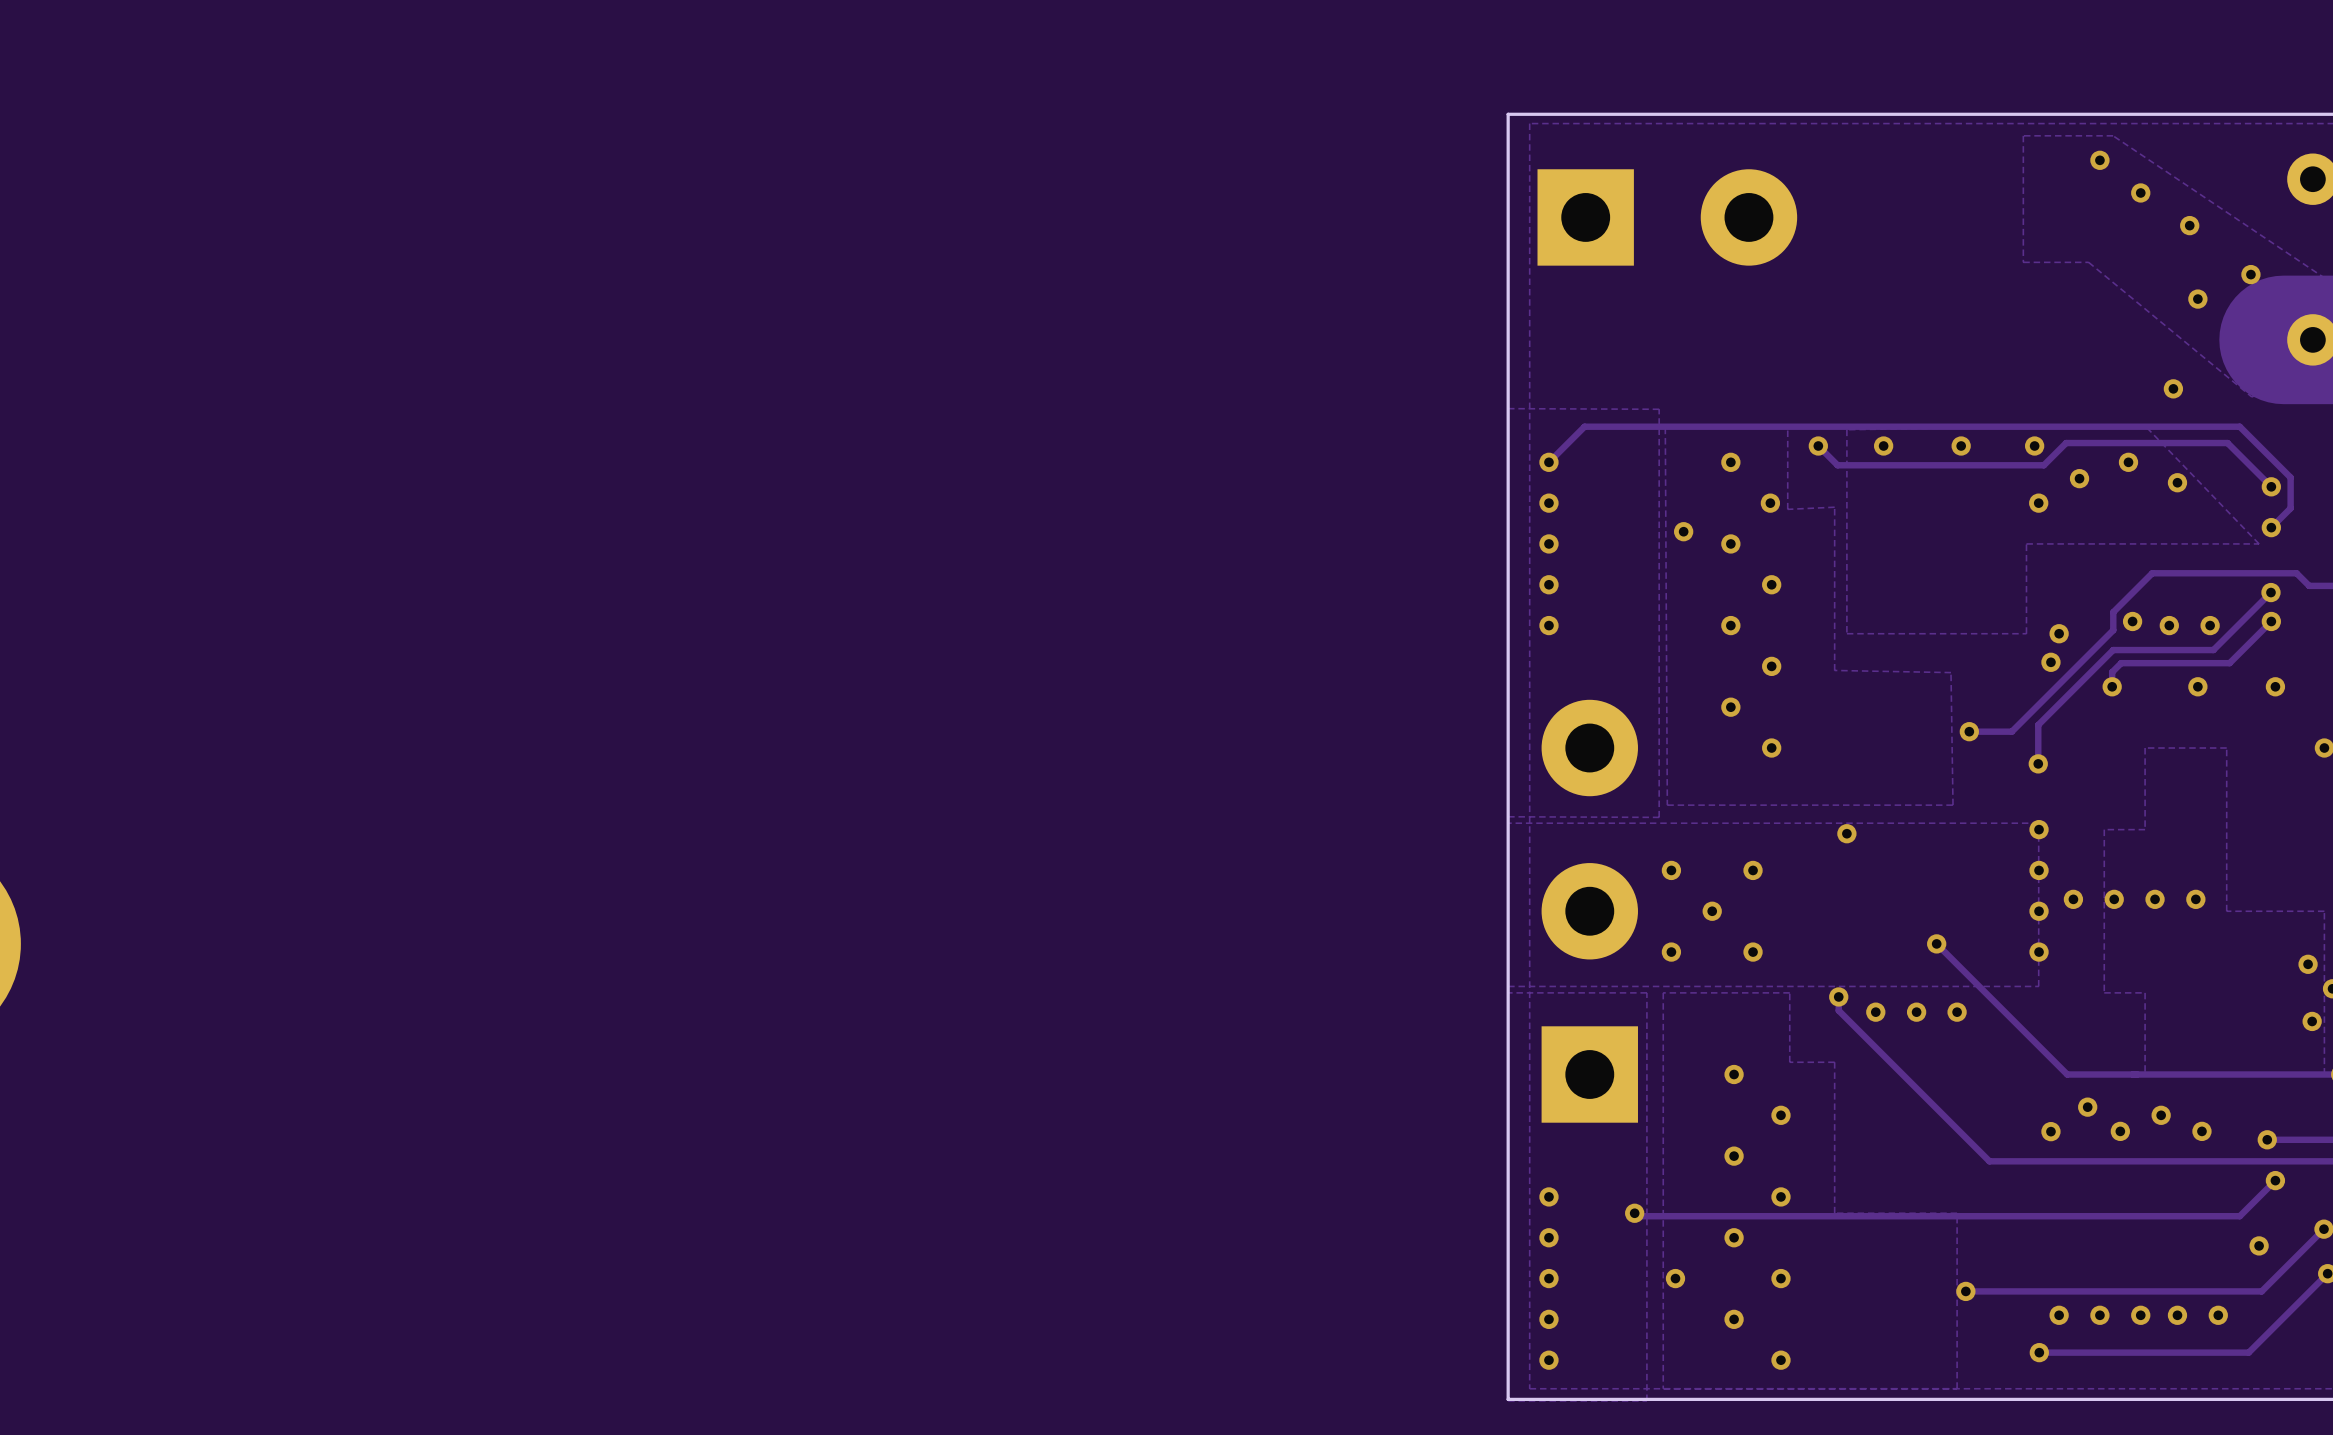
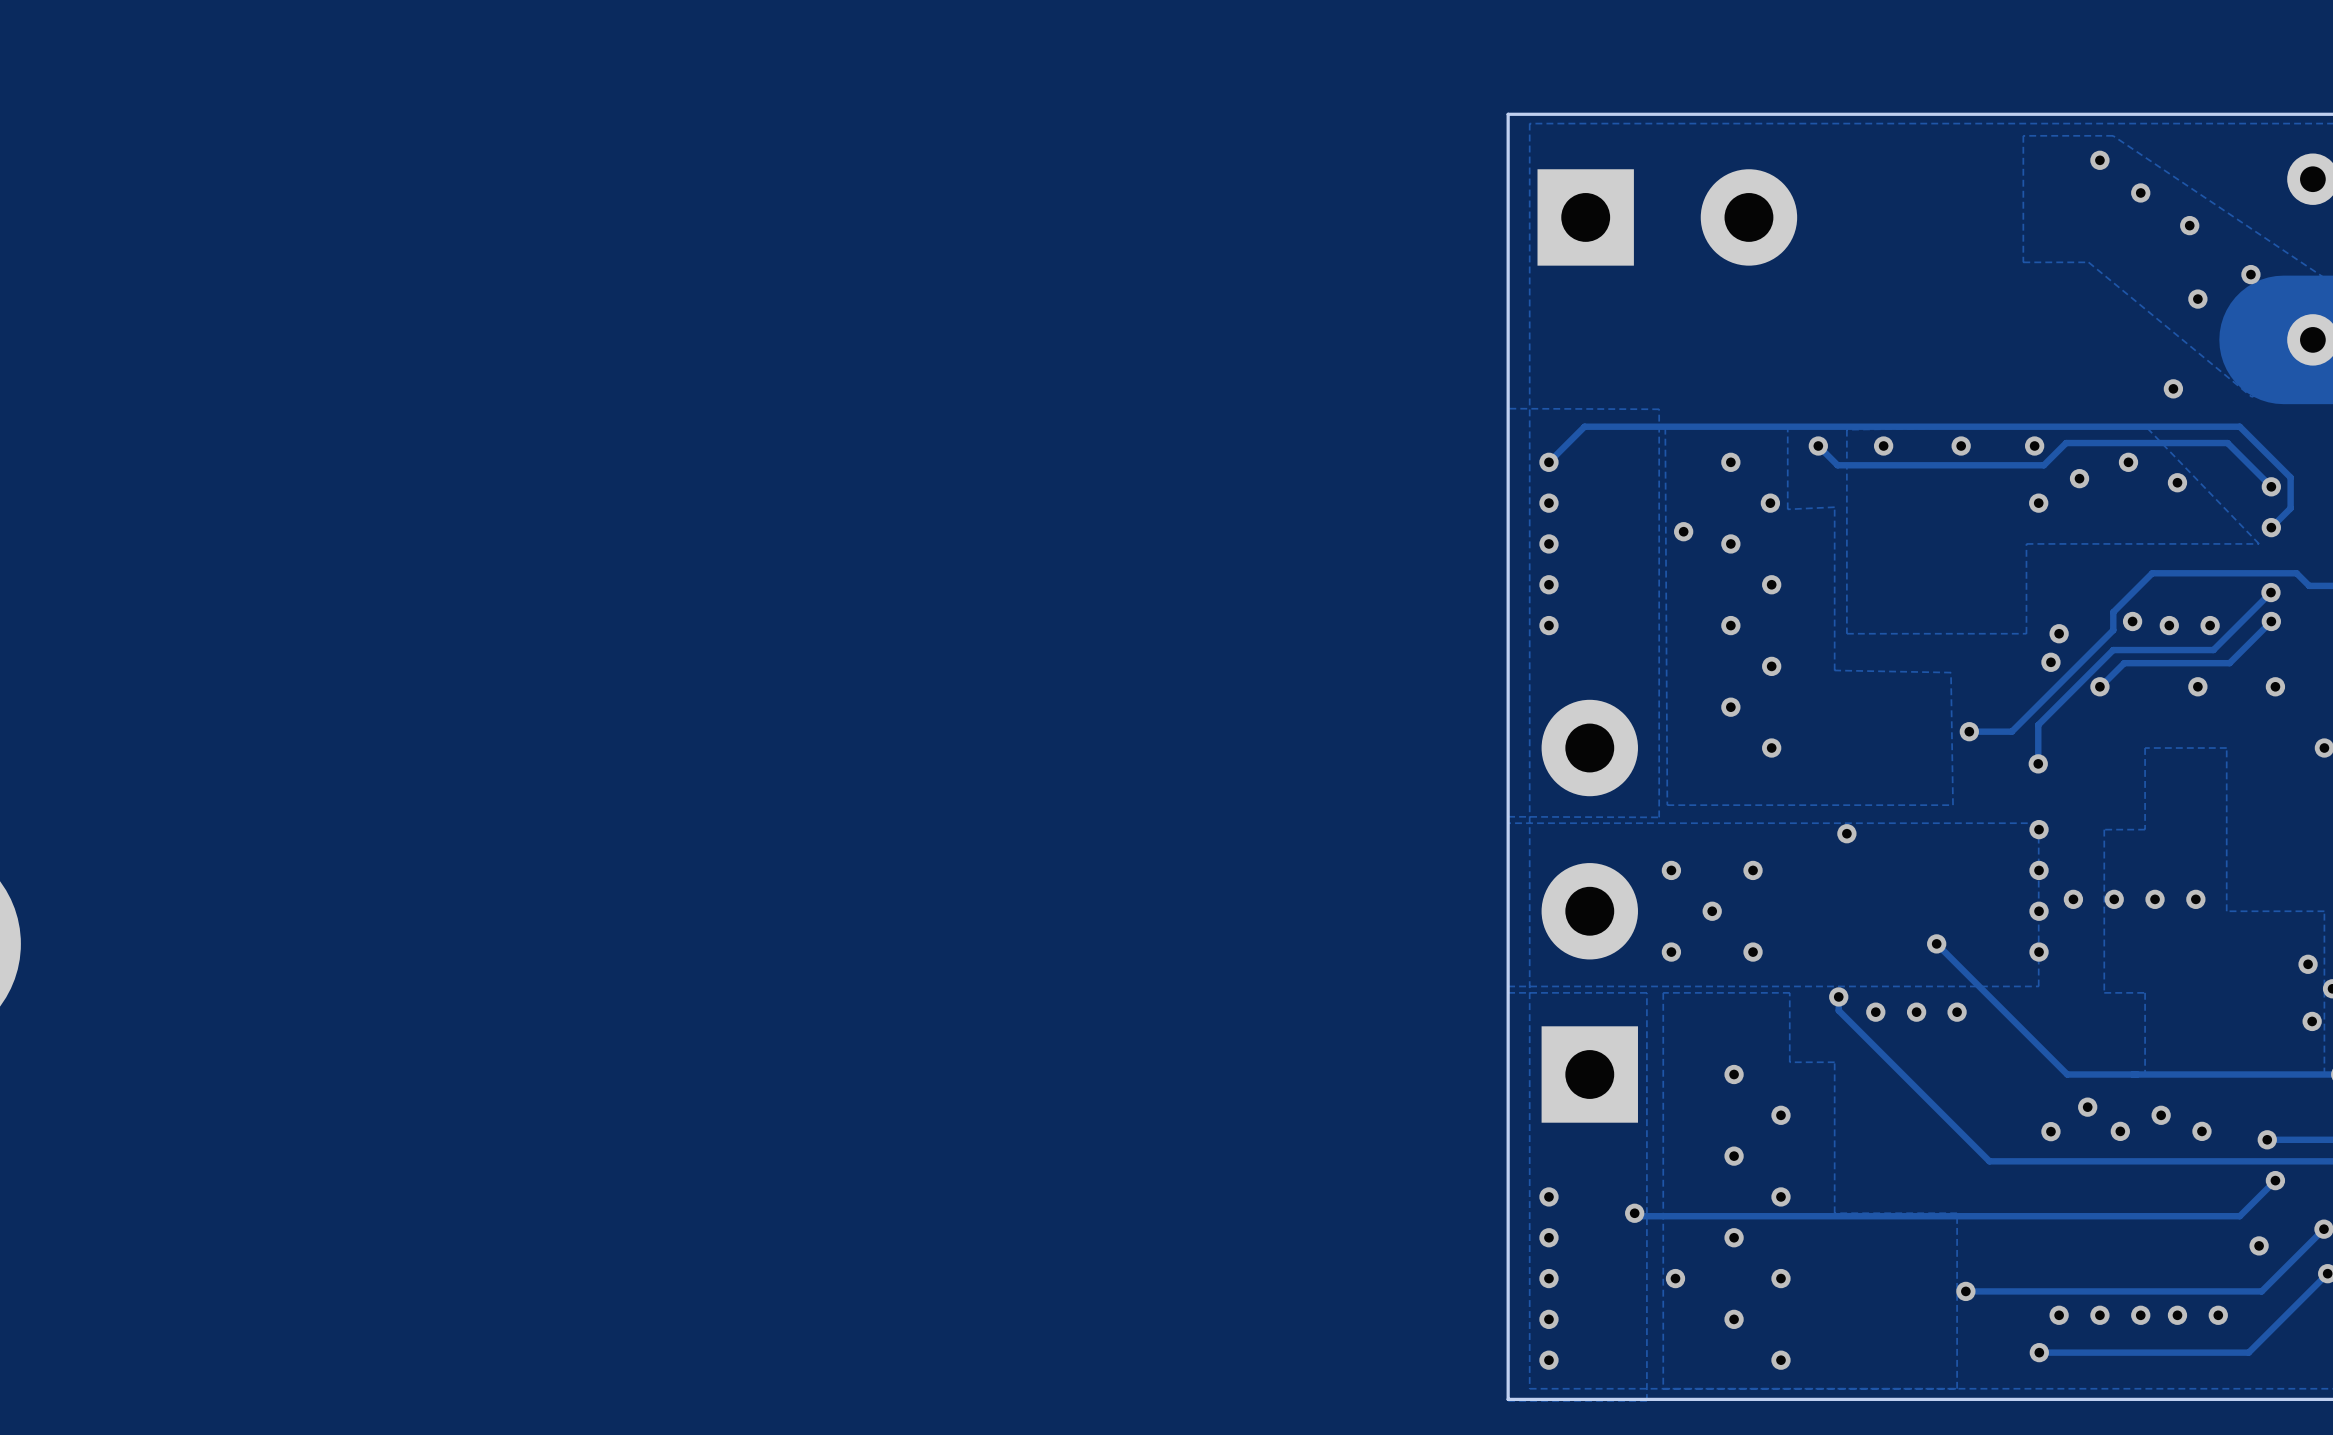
track: (2124, 663) (2121, 663) (2112, 672) (2112, 686) -> (2124, 663) (2099, 686)
via position: (2112, 686) -> (2099, 686)

